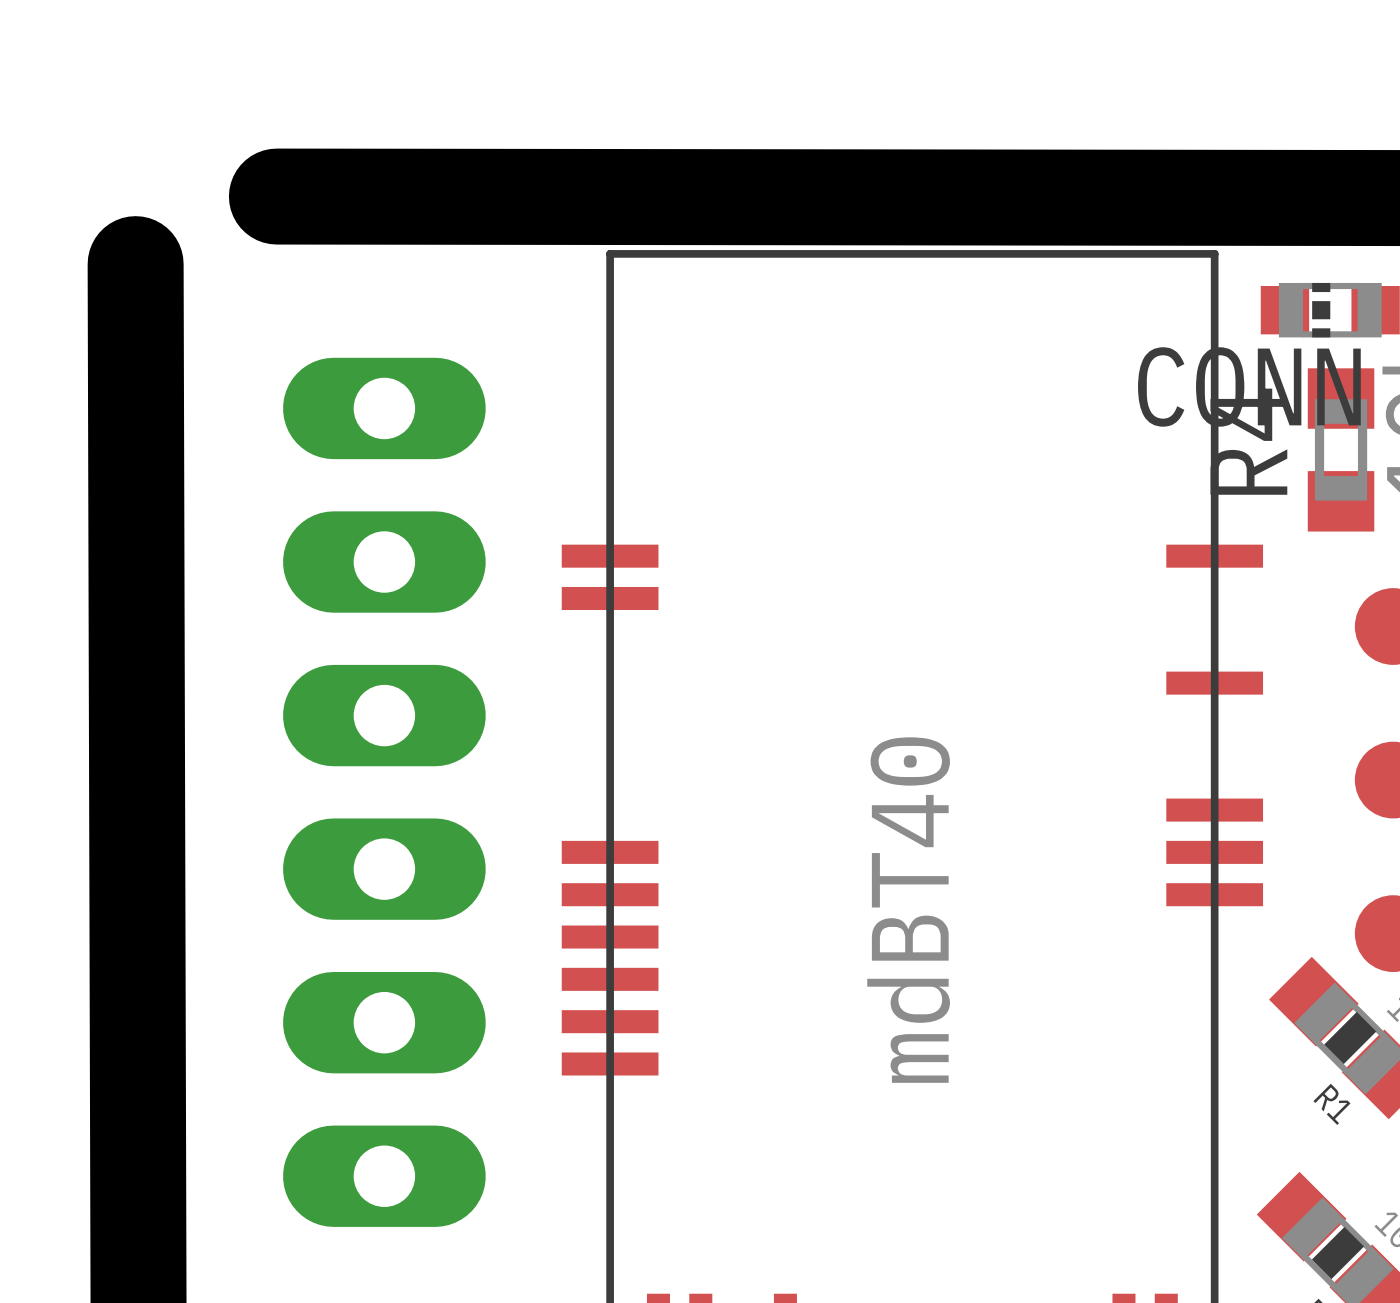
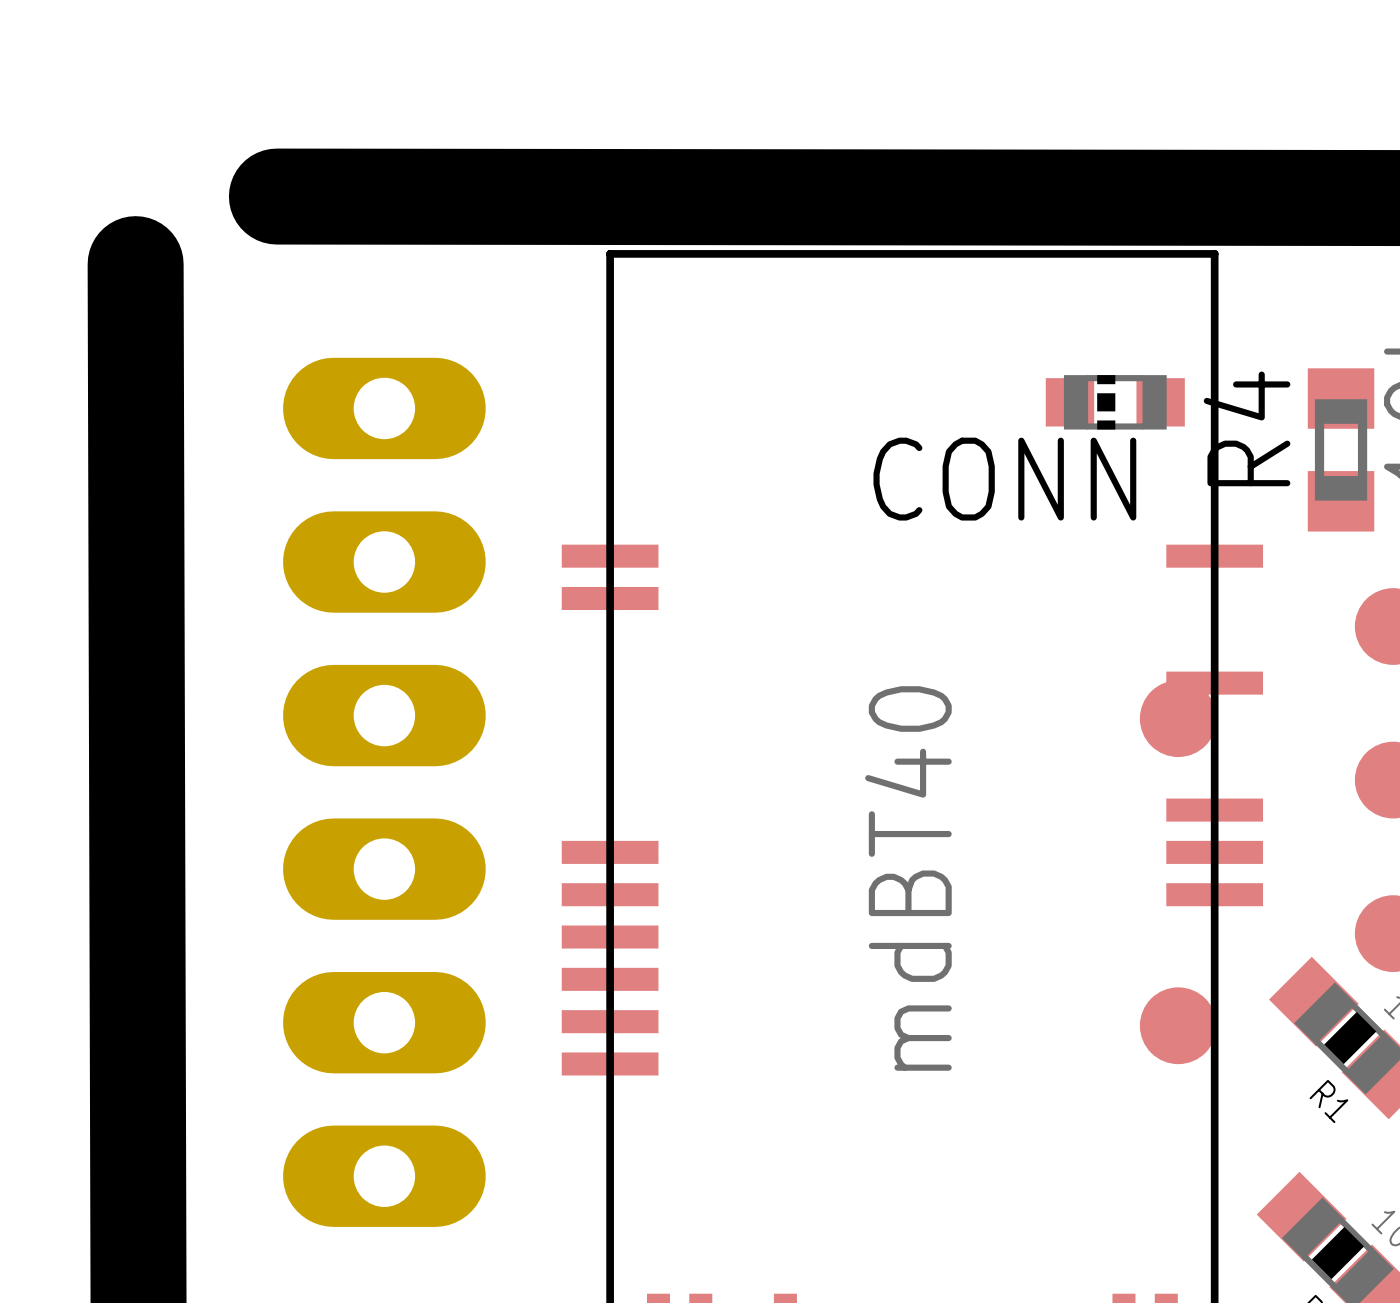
CONN position: (1330, 310) -> (1115, 402)
part: none -> (1178, 718)
part: none -> (1178, 1025)

